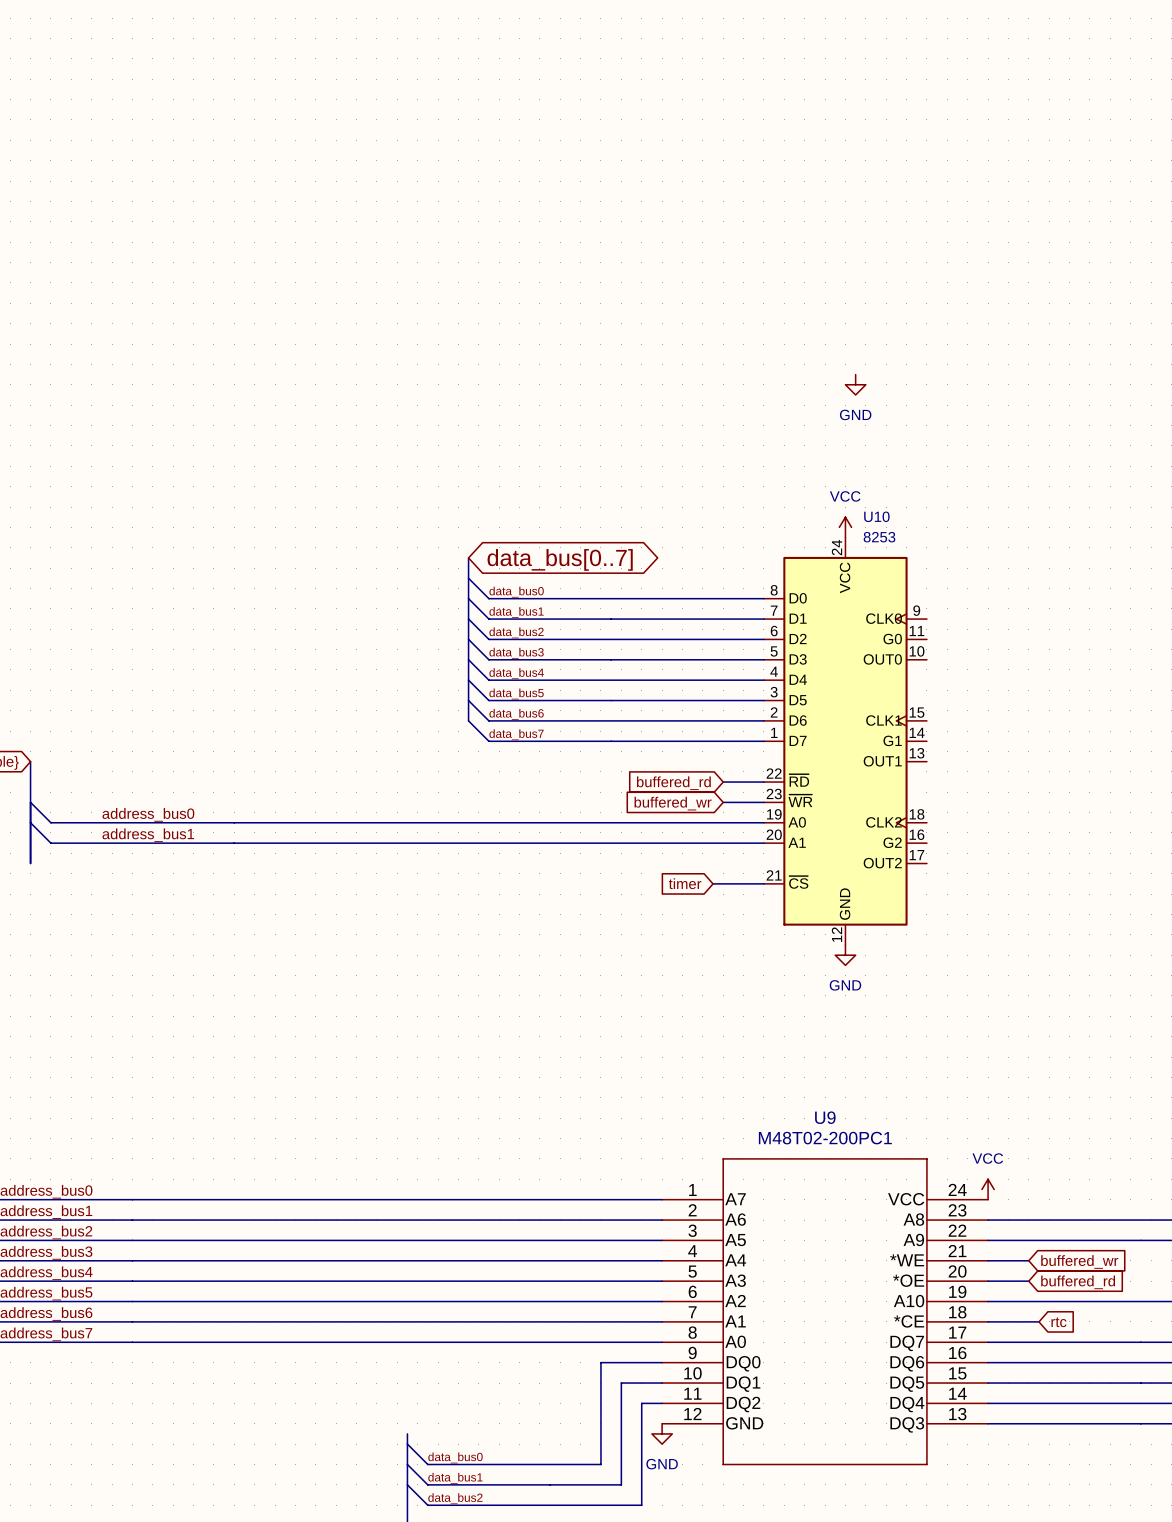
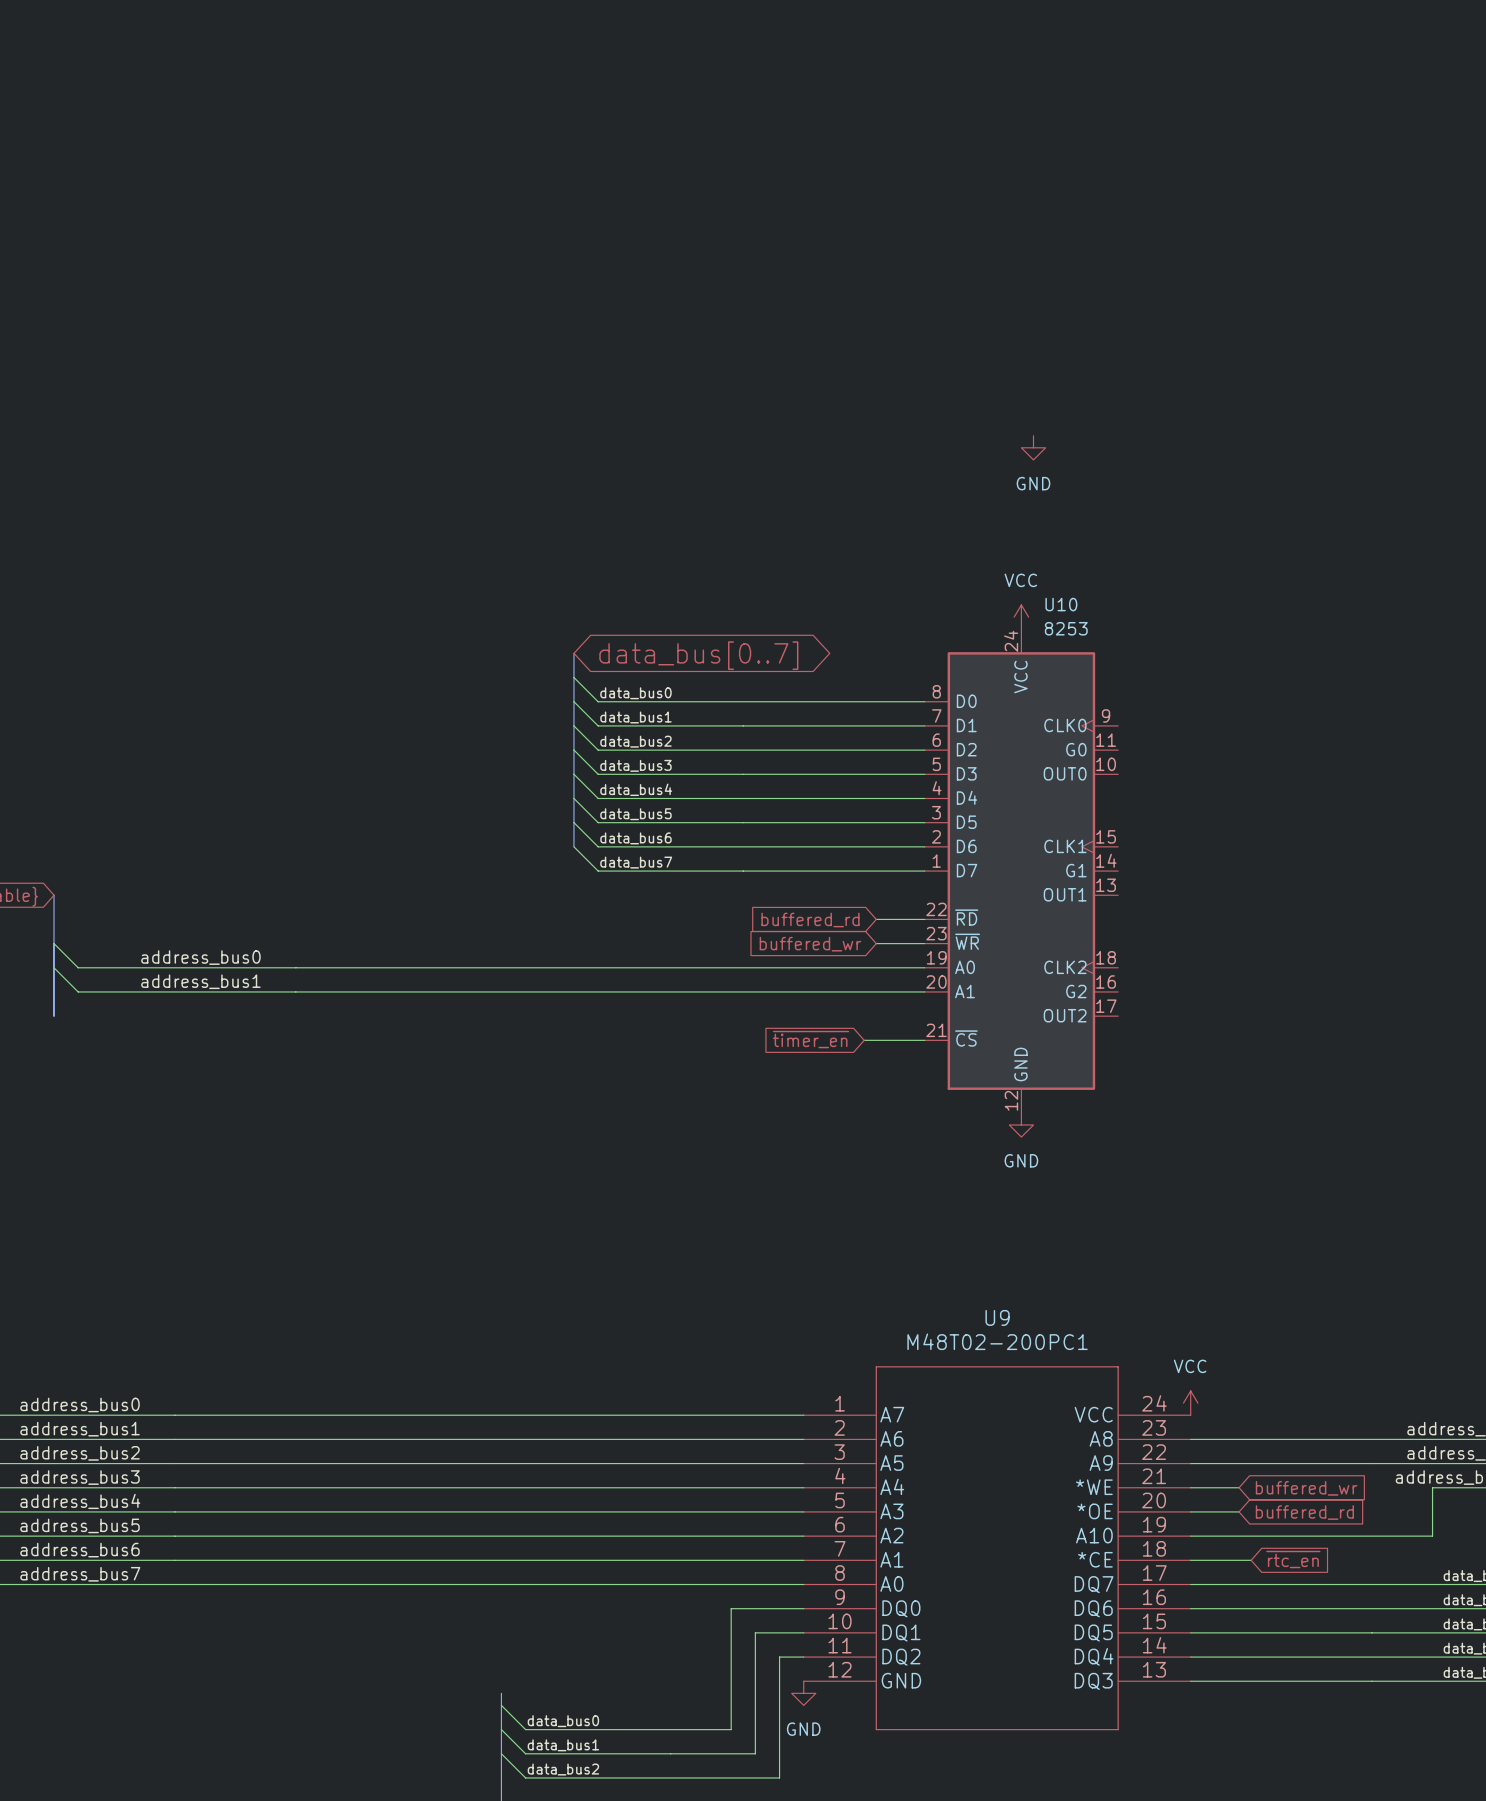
global label: timer (685, 883) -> ~{timer_en} (811, 1039)
global label: rtc (1058, 1322) -> ~{rtc_en} (1293, 1559)

